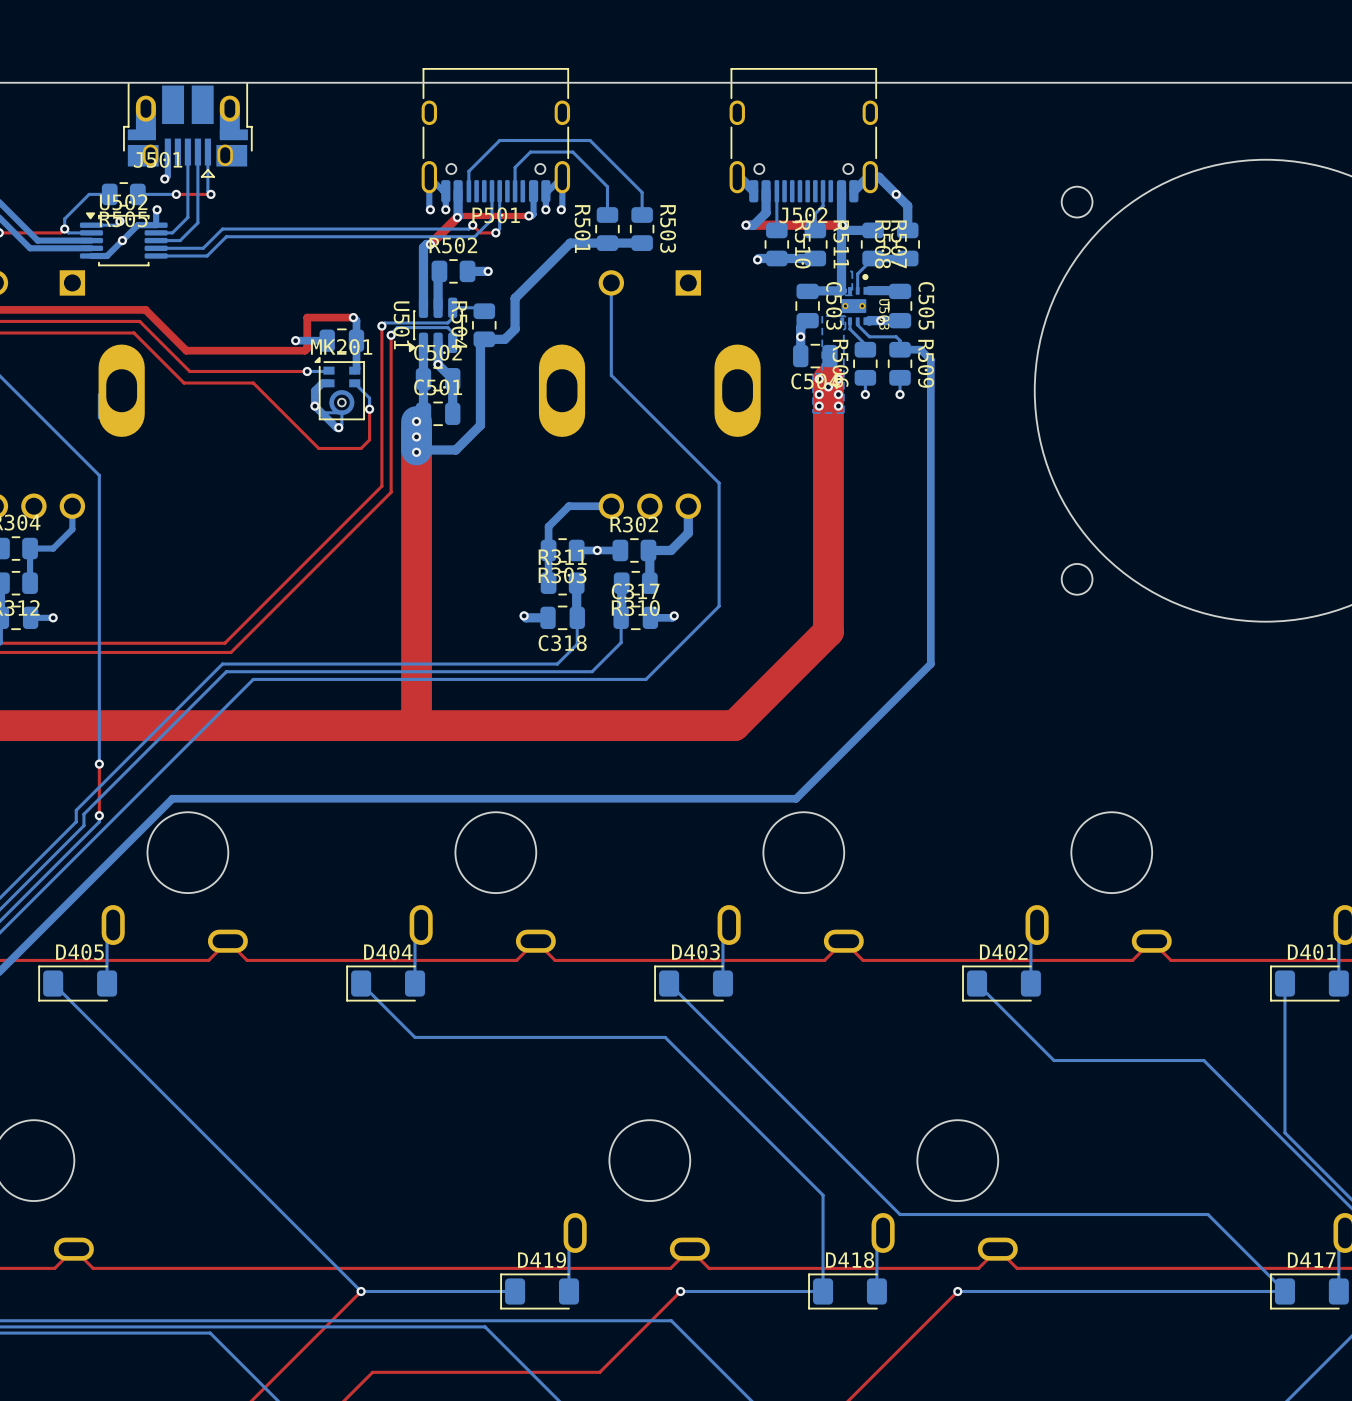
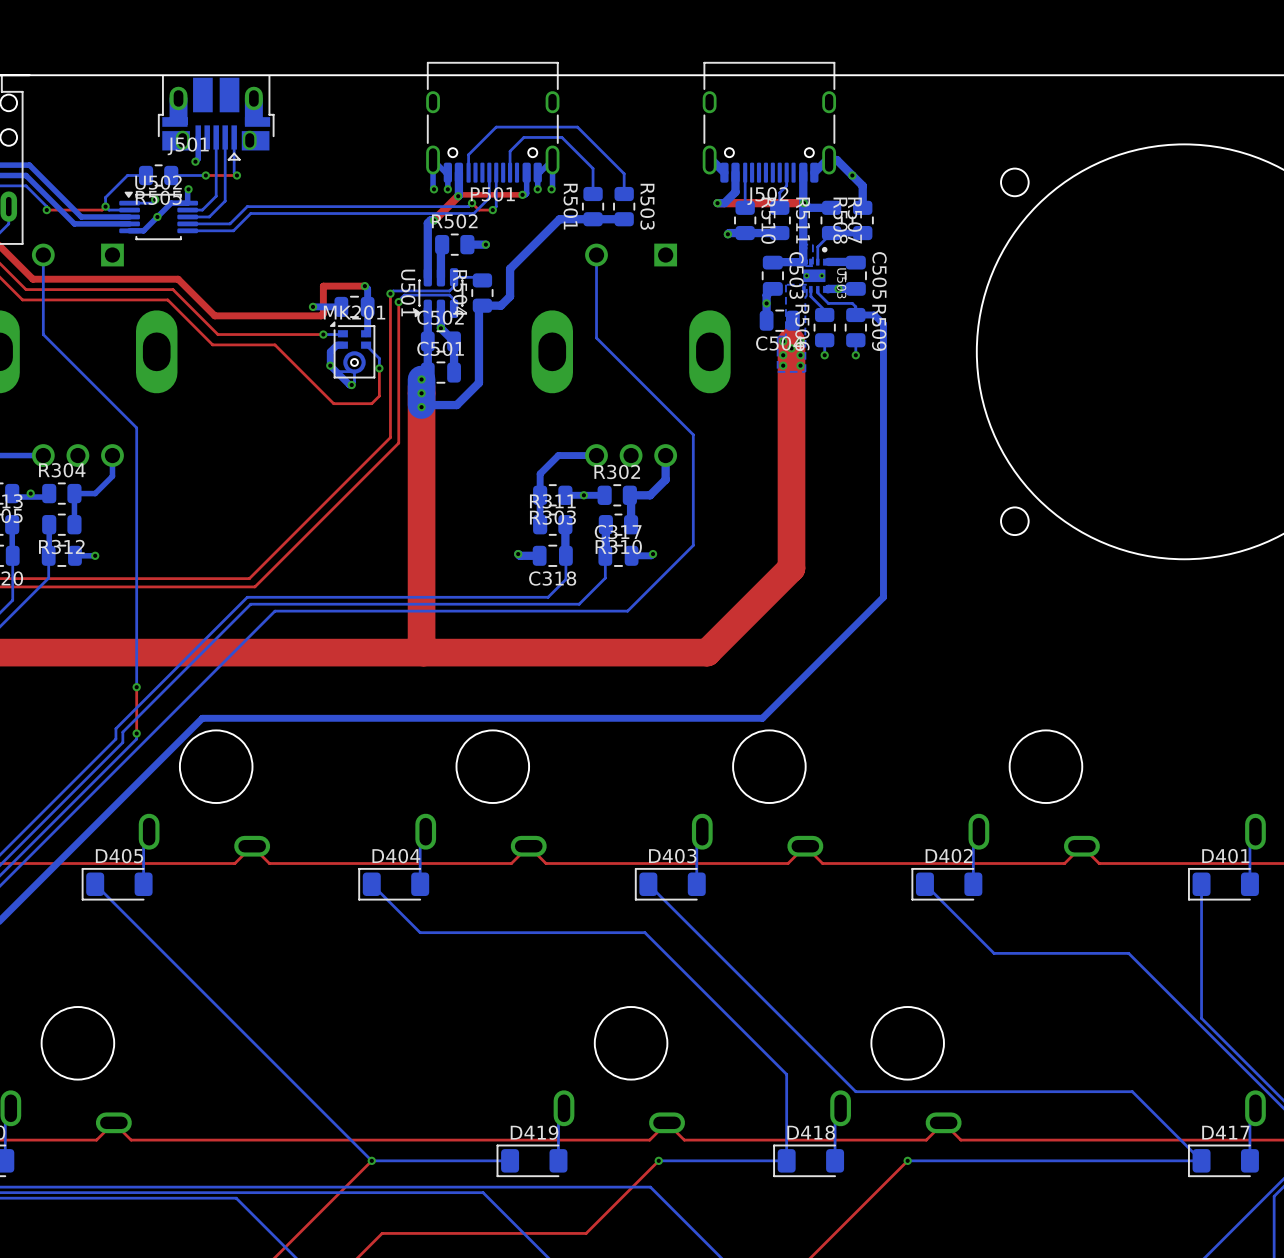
bottom track: (99, 394) (99, 417) -> none

